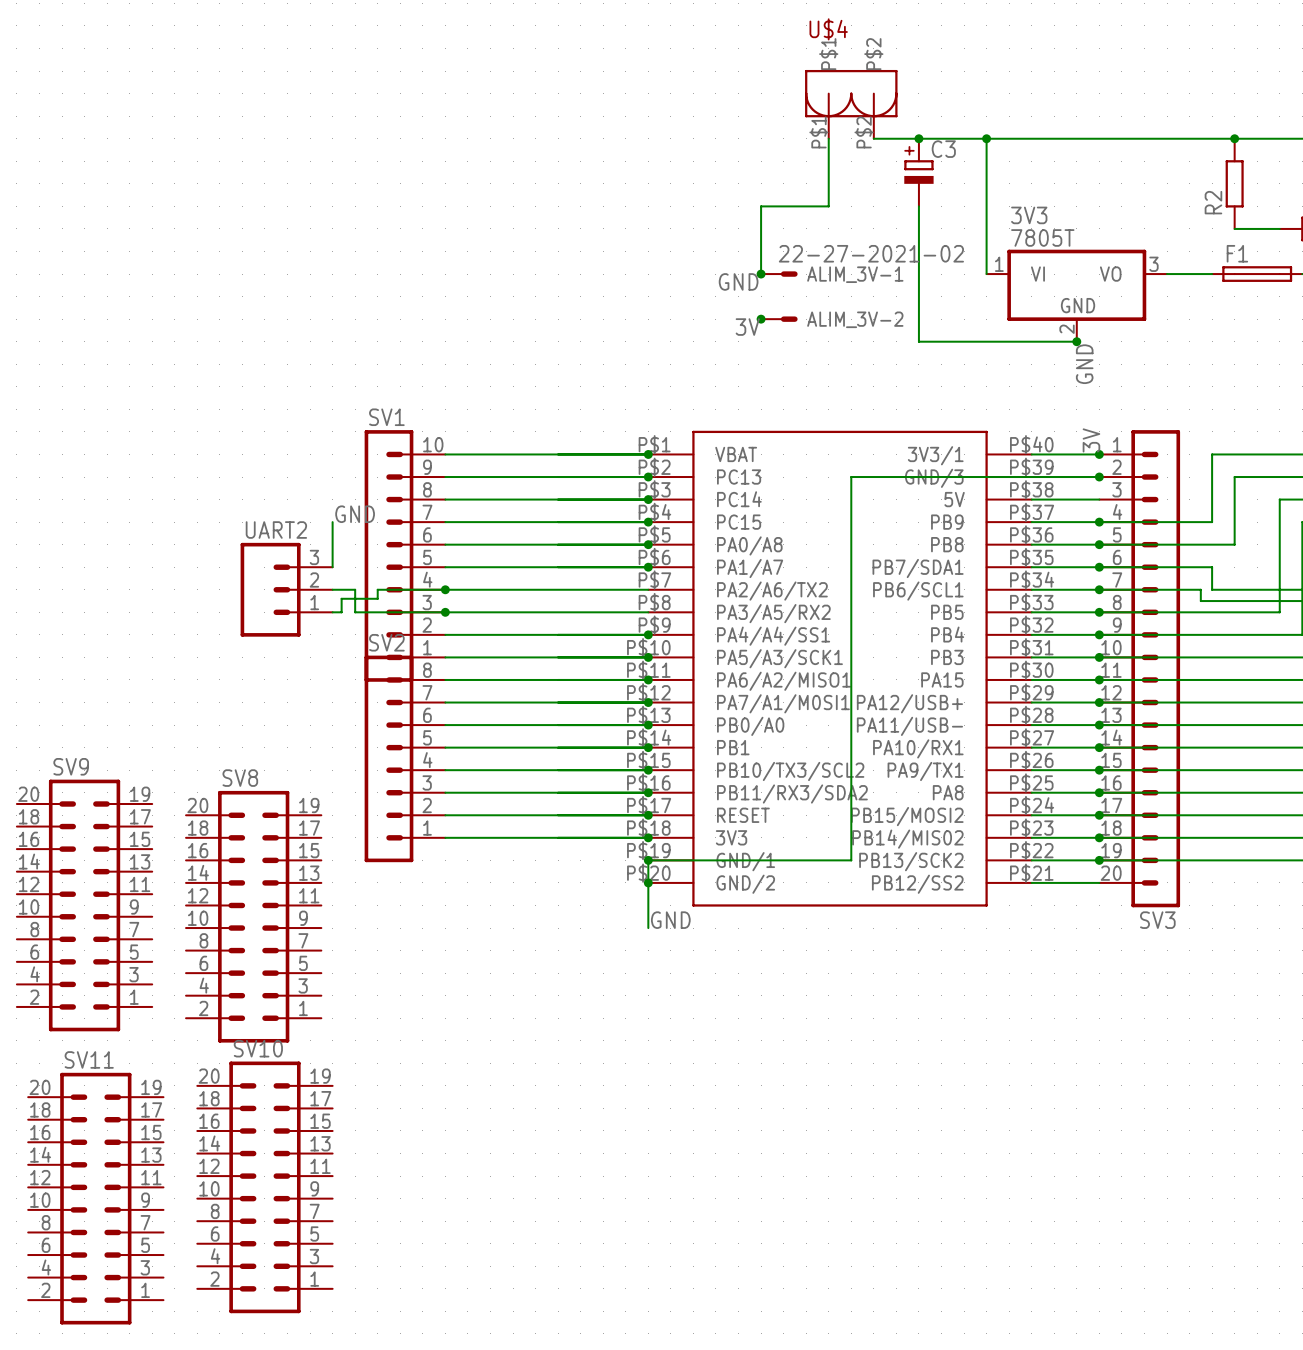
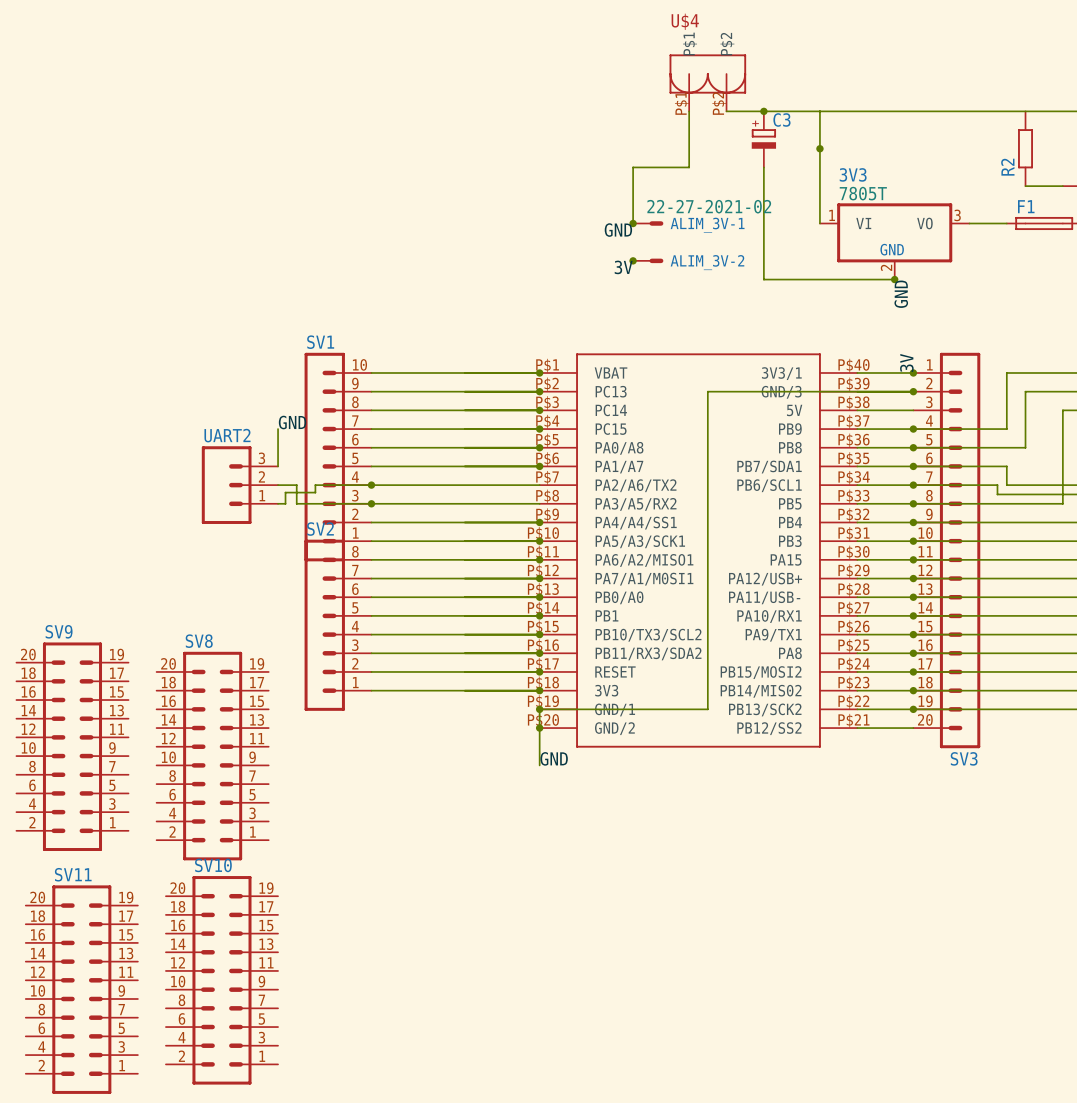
junction position: (986, 138) -> (819, 148)
junction: (1234, 138) -> none

